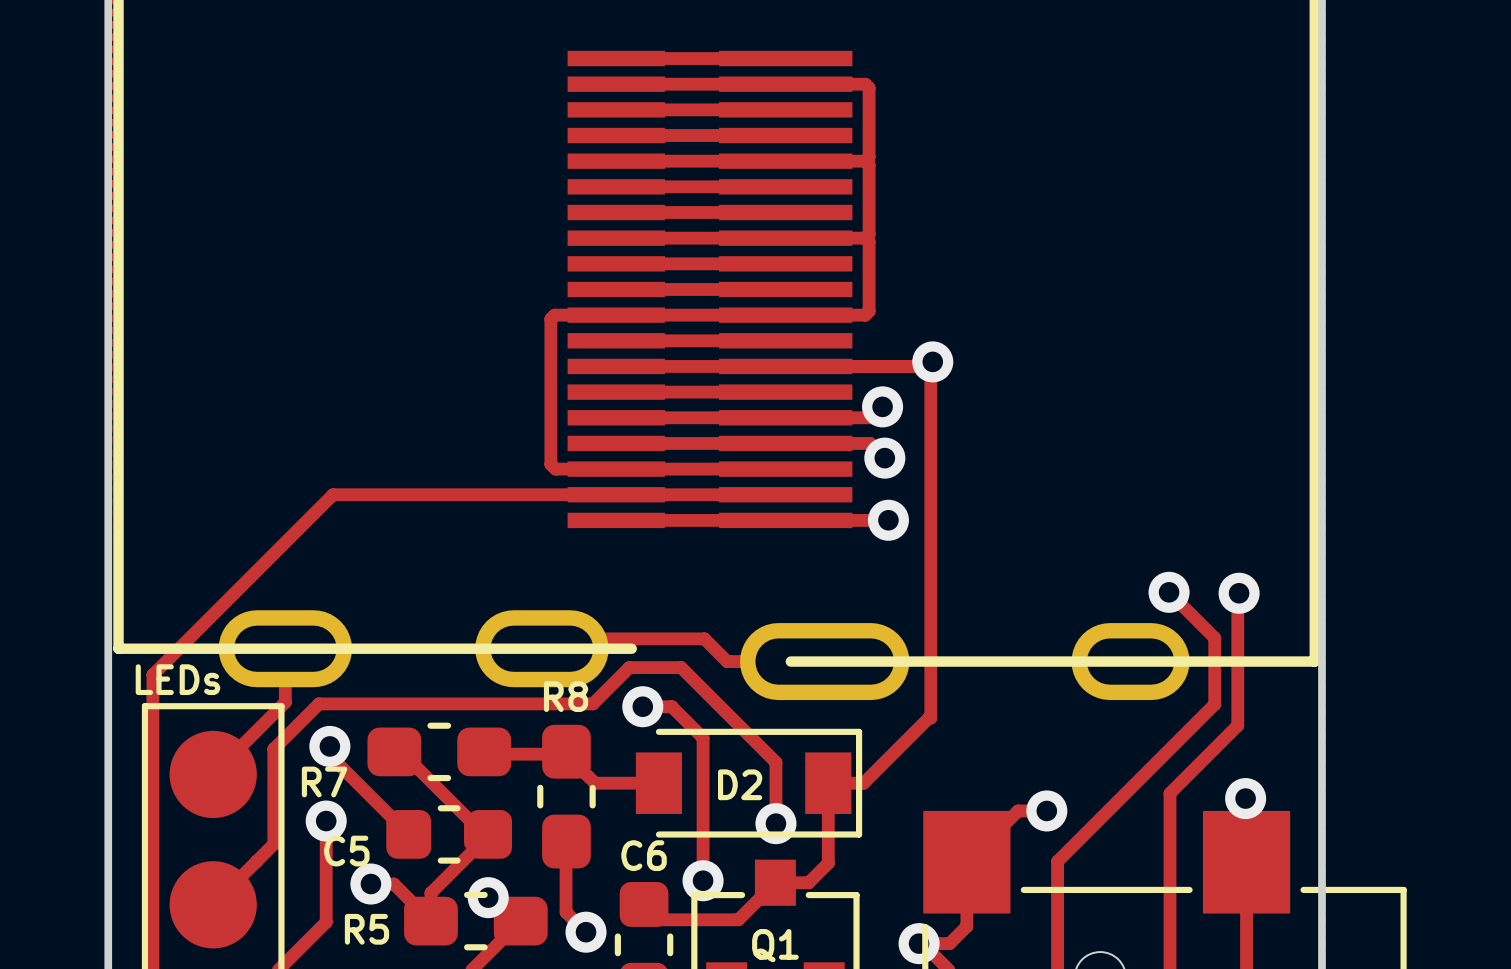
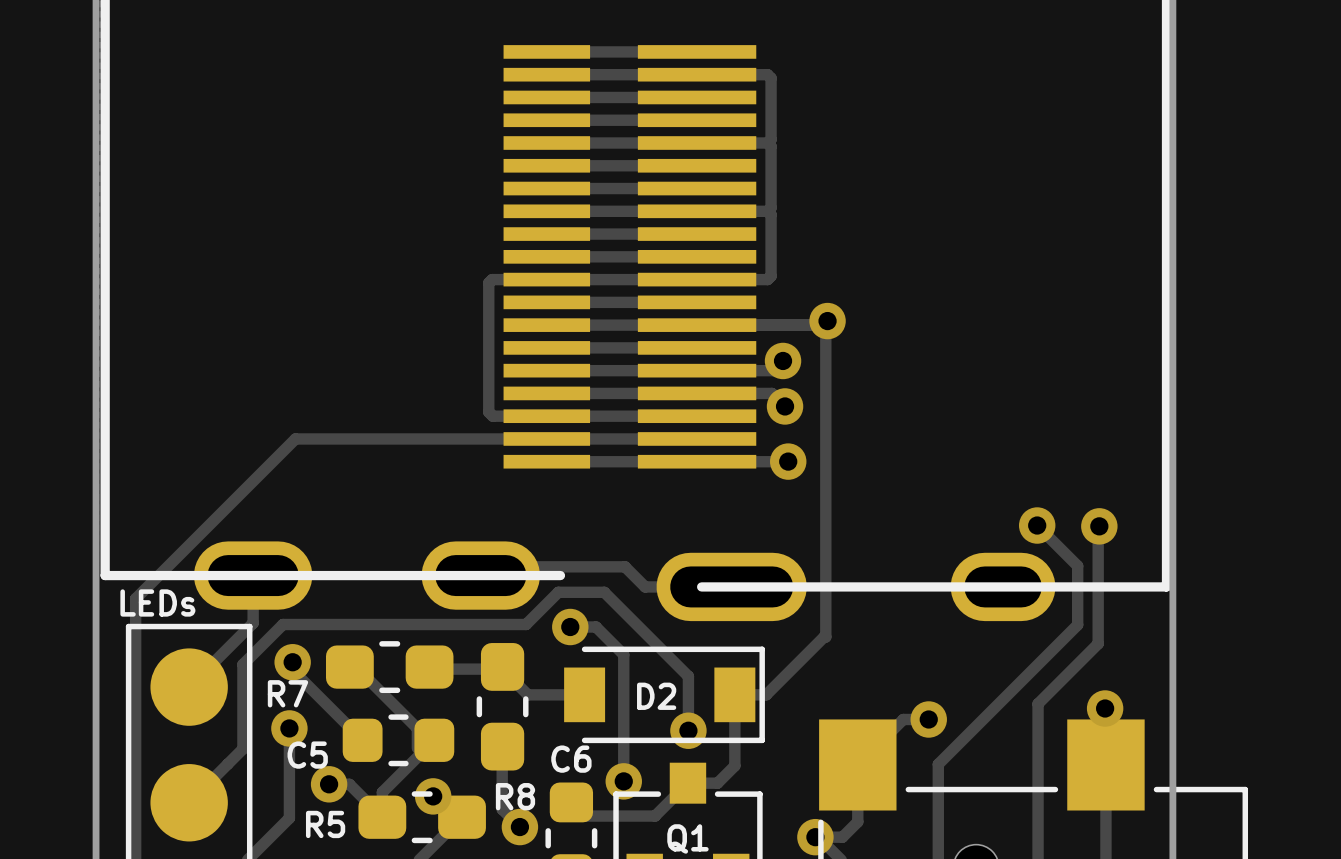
R8 name position: R8 (566, 696) -> R8 (515, 796)

